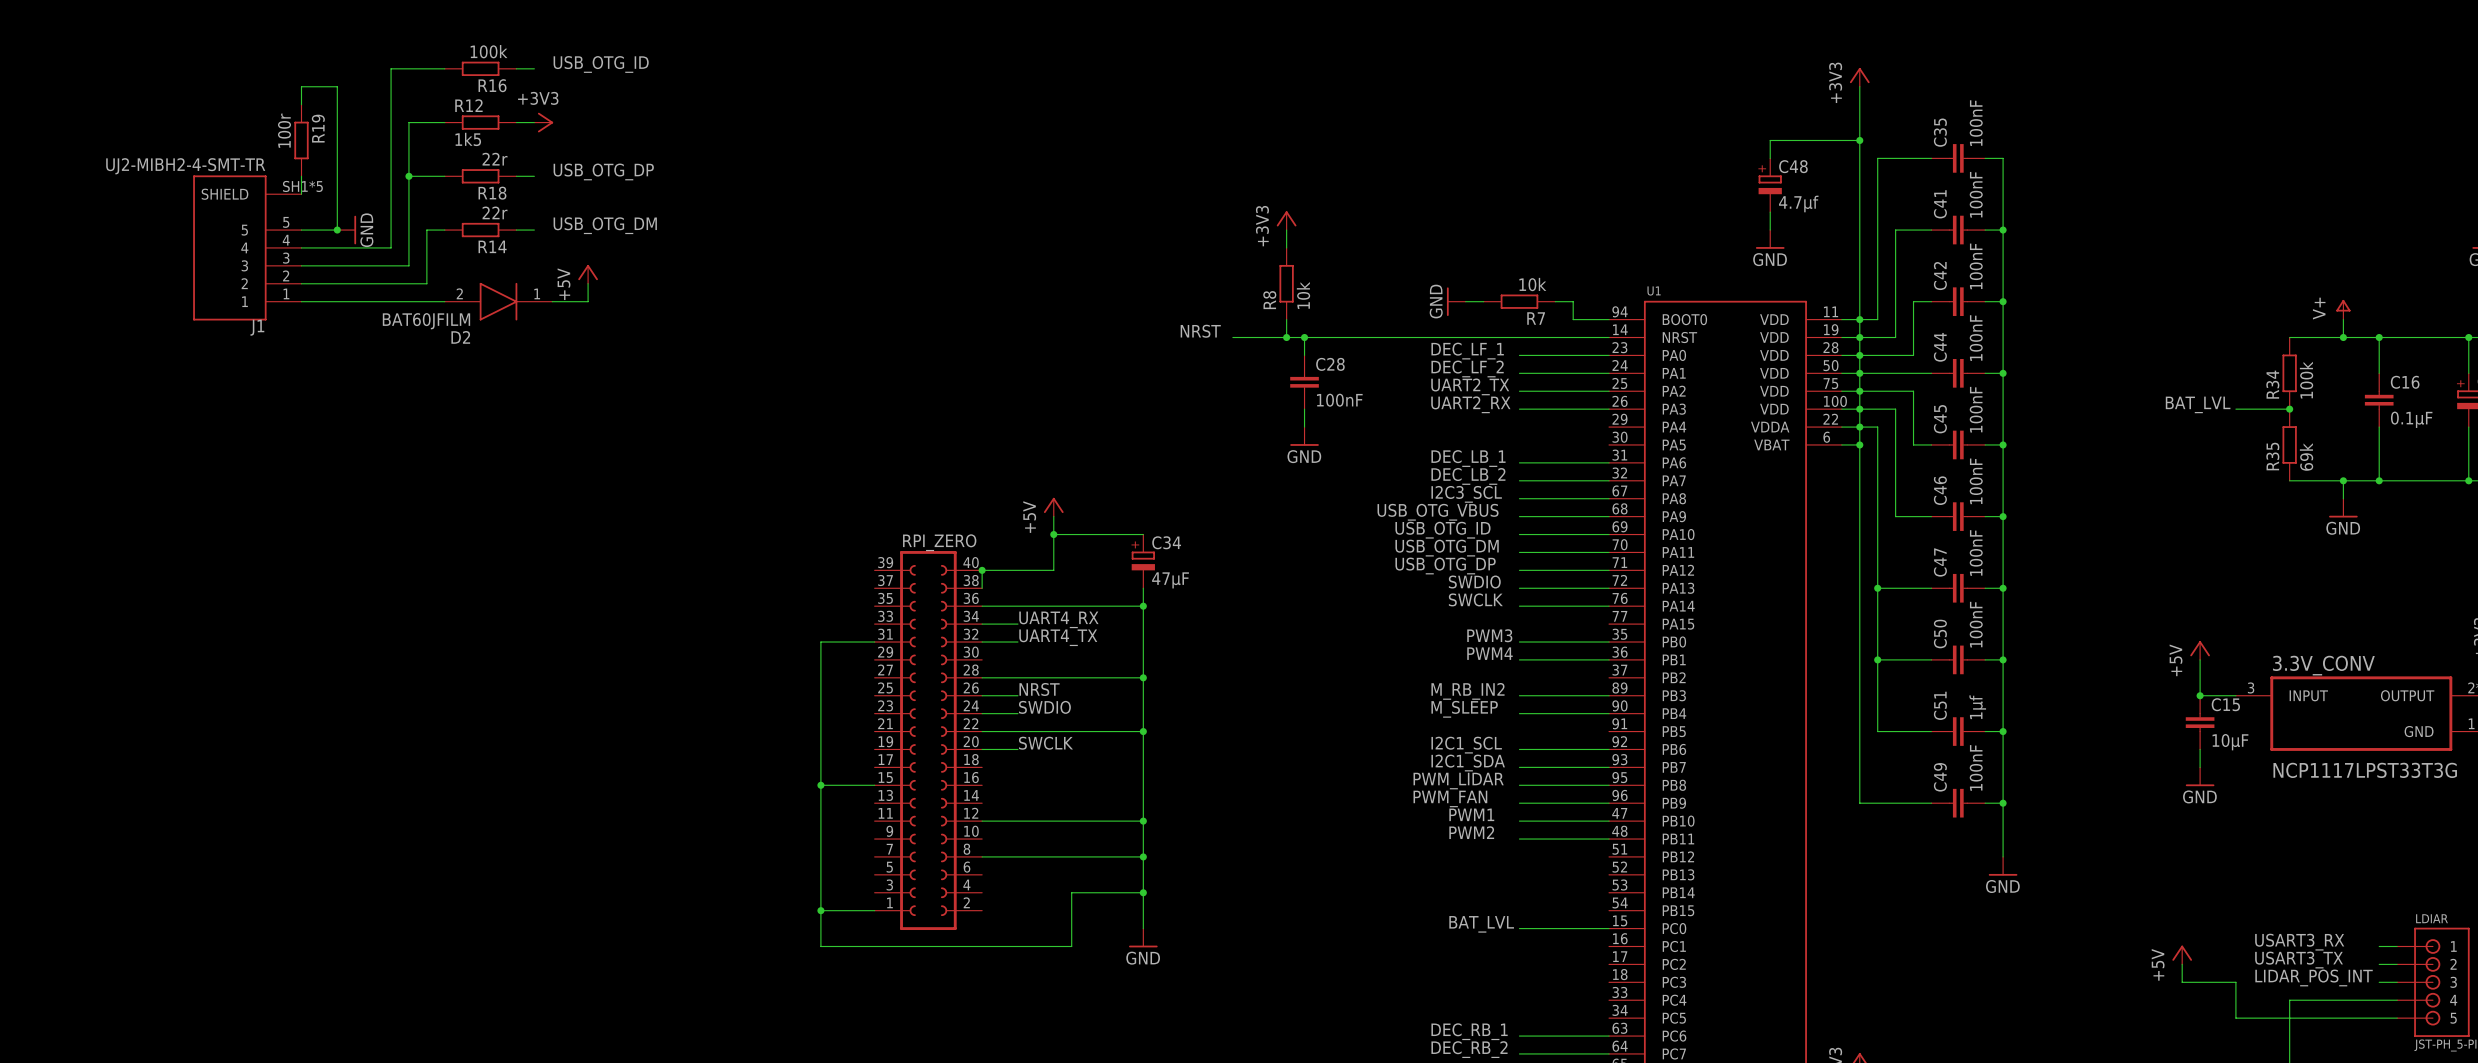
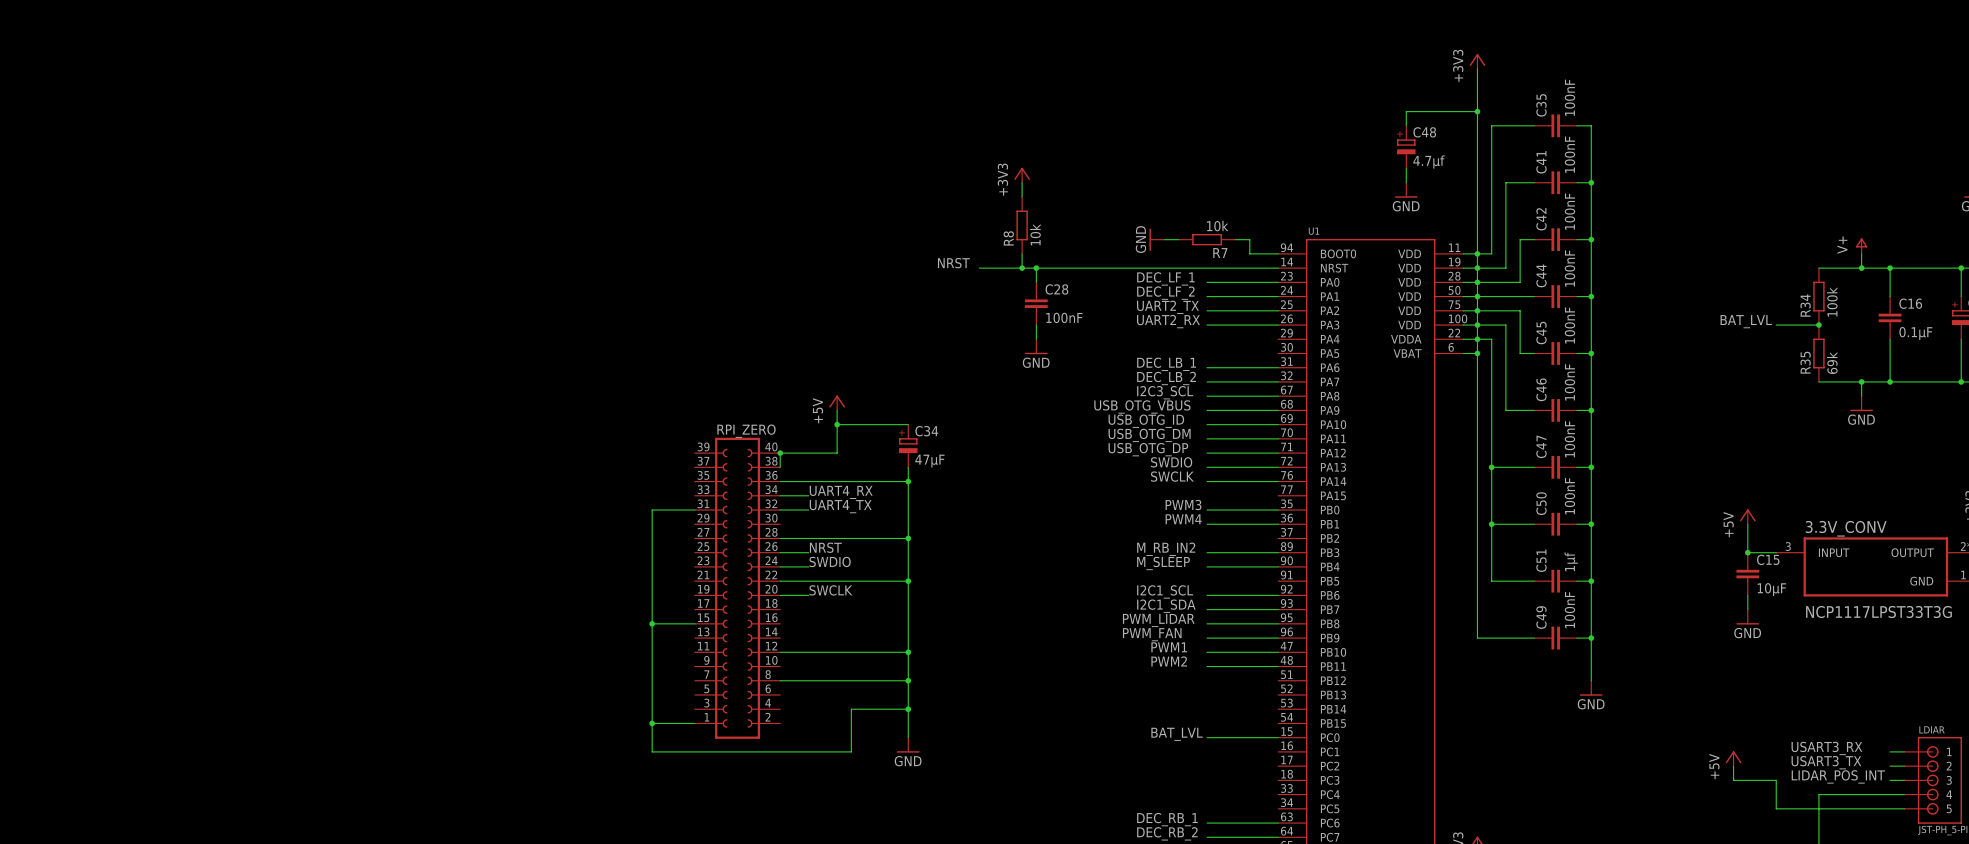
label: USB_OTG_ID (601, 64) -> none
wire: (444, 68) (391, 68) (391, 247) (301, 247) -> none
R16: 100k (480, 68) -> none
wire: (516, 68) (534, 68) -> none
wire: (301, 104) (301, 86) (337, 86) (337, 230) (301, 230) -> none
wire: (444, 122) (408, 122) (408, 265) (301, 265) -> none
R12: 1k5 (480, 122) -> none
wire: (516, 122) (534, 122) -> none
power symbol: +3V3 (543, 122) -> none
R19: 100r (301, 140) -> none
label: USB_OTG_DP (603, 171) -> none
wire: (301, 176) (301, 194) -> none
wire: (408, 176) (444, 176) -> none
junction: (408, 176) -> none
R18: 22r (480, 176) -> none
wire: (516, 176) (534, 176) -> none
label: USB_OTG_DM (605, 225) -> none
junction: (337, 230) -> none
power symbol: GND (346, 230) -> none
wire: (444, 230) (426, 230) (426, 283) (301, 283) -> none
R14: 22r (480, 230) -> none
wire: (516, 230) (534, 230) -> none
J1: UJ2-MIBH2-4-SMT-TR (247, 247) -> none
power symbol: +5V (588, 274) -> none
wire: (588, 283) (588, 301) (552, 301) -> none
wire: (301, 301) (444, 301) -> none
D2: BAT60JFILM (498, 301) -> none

